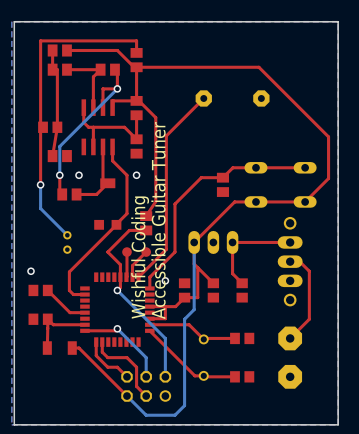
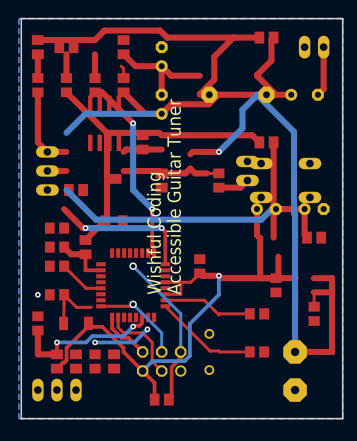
top track: none -> (233, 37) (214, 56) (214, 79) (199, 94)
top track: none -> (259, 37) (167, 37) (160, 30) (104, 30) (95, 40) (37, 40)
part: none -> (266, 37)
top track: none -> (273, 37) (271, 39) (271, 60) (256, 75) (276, 94) (291, 94)
part: none -> (37, 47)
top track: (52, 50) (52, 69) (57, 69) (57, 127) (52, 156) -> none
top track: (66, 50) (117, 50) (136, 69) -> none
part: none -> (123, 47)
part: none -> (314, 47)
top track: none -> (323, 47) (323, 89) (317, 94)
top track: (136, 52) (136, 40) (40, 40) (40, 124) (43, 127) (40, 127) (40, 184) -> none
top track: none -> (37, 54) (37, 78)
top track: none -> (66, 54) (66, 78)
top track: none -> (95, 54) (95, 78)
top track: none -> (123, 54) (135, 66) (161, 66) (171, 75) (199, 75)
part: (136, 60) -> none
part: none -> (161, 56)
part: (59, 69) -> none
top track: (66, 69) (100, 69) (93, 76) (93, 107) -> none
part: (107, 69) -> none
top track: none -> (157, 66) (161, 70) (161, 94)
top track: (117, 81) (117, 88) (102, 88) (102, 107) -> none
part: none -> (37, 85)
part: none -> (66, 85)
part: none -> (95, 85)
bottom track: (117, 88) (59, 146) (59, 175) -> none
part: none -> (123, 85)
via: (117, 88) -> none
top track: none -> (37, 92) (37, 142) (47, 151) (66, 151)
top track: none -> (66, 92) (106, 132)
top track: none -> (95, 92) (102, 92) (133, 123)
top track: none -> (123, 92) (145, 113) (161, 113) (171, 104) (208, 104) (218, 94) (256, 94)
top track: (136, 98) (155, 117) (155, 201) (146, 216) -> none
top track: (203, 98) (166, 135) (166, 249) (138, 277) -> none
part: none -> (304, 94)
top track: (83, 107) (83, 122) (88, 127) (124, 127) (136, 139) (136, 115) -> none
top track: (112, 107) (112, 100) (136, 100) (136, 67) (258, 67) (328, 136) (328, 178) (305, 201) (234, 201) (194, 242) (194, 264) (213, 283) (213, 280) -> none
part: (136, 108) -> none
part: none -> (161, 104)
bottom track: none -> (161, 113) (85, 113) (66, 132)
part: (50, 127) -> none
top track: (93, 127) (93, 146) -> none
bottom track: none -> (133, 123) (133, 190) (152, 209)
via: none -> (133, 123)
top track: none -> (106, 132) (252, 135) (259, 142)
top track: none -> (106, 132) (106, 218) (85, 240)
top track: (102, 146) (102, 183) (107, 183) (96, 194) (76, 194) -> none
top track: (112, 146) (112, 160) (126, 175) (126, 213) (69, 271) (69, 290) (73, 294) (84, 294) -> none
part: none -> (266, 142)
top track: none -> (273, 142) (273, 206) (276, 209)
top track: none -> (161, 149) (126, 149) (123, 151)
part: (59, 156) -> none
top track: none -> (218, 151) (192, 151) (190, 154)
bottom track: none -> (218, 151) (242, 128) (242, 109) (256, 94) (294, 131) (295, 351)
via: none -> (218, 151)
top track: (305, 167) (232, 167) (222, 177) (213, 177) -> none
part: none -> (47, 170)
top track: (59, 175) (59, 192) (62, 194) -> (66, 170) (47, 170)
via: (59, 175) -> none
via: (78, 175) -> none
via: (136, 175) -> none
part: none -> (247, 170)
top track: (201, 177) (174, 204) (174, 252) (149, 277) (149, 288) -> (206, 173) (195, 173) (190, 168) (185, 173) (123, 170)
bottom track: (40, 184) (40, 208) (67, 235) -> none
via: (40, 184) -> none
part: none -> (161, 180)
part: none -> (218, 180)
part: (222, 184) -> none
top track: none -> (247, 180) (240, 187) (218, 187)
bottom track: none -> (66, 190) (96, 219) (261, 219) (271, 209) (276, 209)
top track: none -> (64, 209) (83, 228) (85, 228)
top track: none -> (152, 209) (152, 245) (154, 253)
via: none -> (152, 209)
top track: none -> (256, 209) (256, 235) (260, 238) (260, 278)
part: none -> (266, 209)
top track: none -> (276, 209) (273, 211) (273, 237)
top track: none -> (276, 209) (304, 209) (304, 235) (306, 237)
part: none -> (314, 209)
text position: Accessible Guitar Tuner (158, 220) -> Accessible Guitar Tuner (173, 196)
part: (146, 223) -> none
top track: (146, 230) (129, 230) (107, 252) (120, 264) (120, 287) (117, 290) -> none
part: none -> (56, 228)
via: none -> (85, 228)
top track: none -> (161, 228) (165, 231) (165, 264)
bottom track: none -> (161, 228) (85, 228)
via: none -> (161, 228)
part: (67, 242) -> none
bottom track: (194, 242) (194, 309) (184, 319) (184, 405) (174, 415) (146, 415) (126, 396) -> none
part: (213, 242) -> none
top track: (290, 242) (232, 242) (232, 273) (242, 283) -> none
part: none -> (314, 237)
part: none -> (56, 247)
top track: none -> (64, 247) (71, 254) (85, 254) (85, 270) (100, 270)
part: none -> (85, 247)
top track: (126, 252) (126, 277) -> none
part: (126, 252) -> none
top track: (146, 252) (132, 265) (132, 277) -> none
part: (146, 252) -> none
text position: Wishful Coding (140, 257) -> Wishful Coding (155, 233)
top track: none -> (278, 256) (278, 278)
top track: (290, 261) (299, 261) (309, 271) (309, 297) -> none
part: (290, 261) -> none
top track: (197, 267) (197, 297) (184, 297) (175, 306) (149, 306) -> none
via: (31, 271) -> none
part: none -> (56, 266)
top track: none -> (64, 266) (86, 288) (100, 288)
via: none -> (133, 266)
part: none -> (199, 266)
via: (165, 280) -> none
bottom track: none -> (218, 275) (218, 294) (189, 323) (189, 355) (184, 361) (152, 361) (142, 371)
via: none -> (218, 275)
top track: none -> (295, 278) (221, 278) (218, 275) (202, 275) (199, 273) (190, 282) (165, 282)
top track: none -> (313, 278) (332, 278) (332, 351) (295, 351)
part: (40, 290) -> none
top track: (47, 290) (57, 300) -> (63, 323) (64, 294)
bottom track: (117, 290) (165, 338) (165, 376) -> (133, 266) (180, 313) (180, 351)
via: (117, 290) -> none
part: (184, 290) -> none
part: (213, 290) -> none
part: (242, 290) -> none
part: none -> (276, 285)
top track: none -> (332, 292) (313, 292)
via: none -> (37, 294)
part: none -> (56, 294)
top track: (165, 306) (165, 318) (149, 318) -> (180, 282) (180, 294) (165, 294)
part position: (117, 309) -> (133, 285)
via: none -> (133, 304)
top track: (309, 312) (309, 319) (290, 338) -> none
part: (40, 319) -> none
part: none -> (256, 313)
part: none -> (314, 313)
top track: none -> (112, 317) (112, 328) (121, 337) (128, 337) (142, 351)
top track: none -> (142, 317) (141, 323) (133, 326)
top track: (84, 324) (53, 324) (47, 319) (47, 348) -> none
top track: (149, 324) (189, 324) (203, 339) (234, 338) -> (165, 300) (204, 300) (218, 314) (249, 313)
part: none -> (37, 323)
top track: (117, 328) (115, 330) (84, 330) -> (133, 304) (131, 306) (100, 306)
bottom track: (117, 328) (146, 357) (146, 376) -> (133, 304) (161, 332) (161, 351)
via: (117, 328) -> none
top track: (149, 330) (194, 375) (234, 376) -> (165, 306) (210, 351) (249, 351)
bottom track: none -> (133, 326) (123, 336) (92, 336) (86, 342) (56, 342)
via: none -> (133, 326)
bottom track: none -> (147, 329) (134, 342) (95, 342)
via: none -> (147, 329)
top track: none -> (37, 330) (37, 354) (56, 354) (56, 342)
part: (242, 338) -> none
top track: (96, 342) (96, 355) (107, 367) (117, 367) (126, 376) -> none
top track: (102, 342) (102, 352) (107, 357) (126, 357) (136, 367) (136, 386) (146, 396) -> (118, 317) (118, 327) (123, 332) (142, 332) (152, 342) (152, 361) (161, 371)
via: none -> (56, 342)
part position: (59, 348) -> (75, 323)
top track: (72, 348) (78, 348) (126, 396) -> none
via: none -> (95, 342)
top track: none -> (180, 351) (180, 358) (171, 367) (171, 396) (168, 399)
part: none -> (256, 351)
part position: (290, 357) -> (295, 371)
part: none -> (56, 361)
part: none -> (75, 361)
part: none -> (95, 361)
part: none -> (114, 361)
top track: none -> (56, 368) (66, 360) (66, 348) (88, 326) (88, 323) (91, 326) (102, 326) (123, 348) (123, 351) (154, 382) (154, 399)
part: (242, 376) -> none
part position: (146, 386) -> (161, 361)
part: none -> (56, 390)
part: none -> (161, 399)

